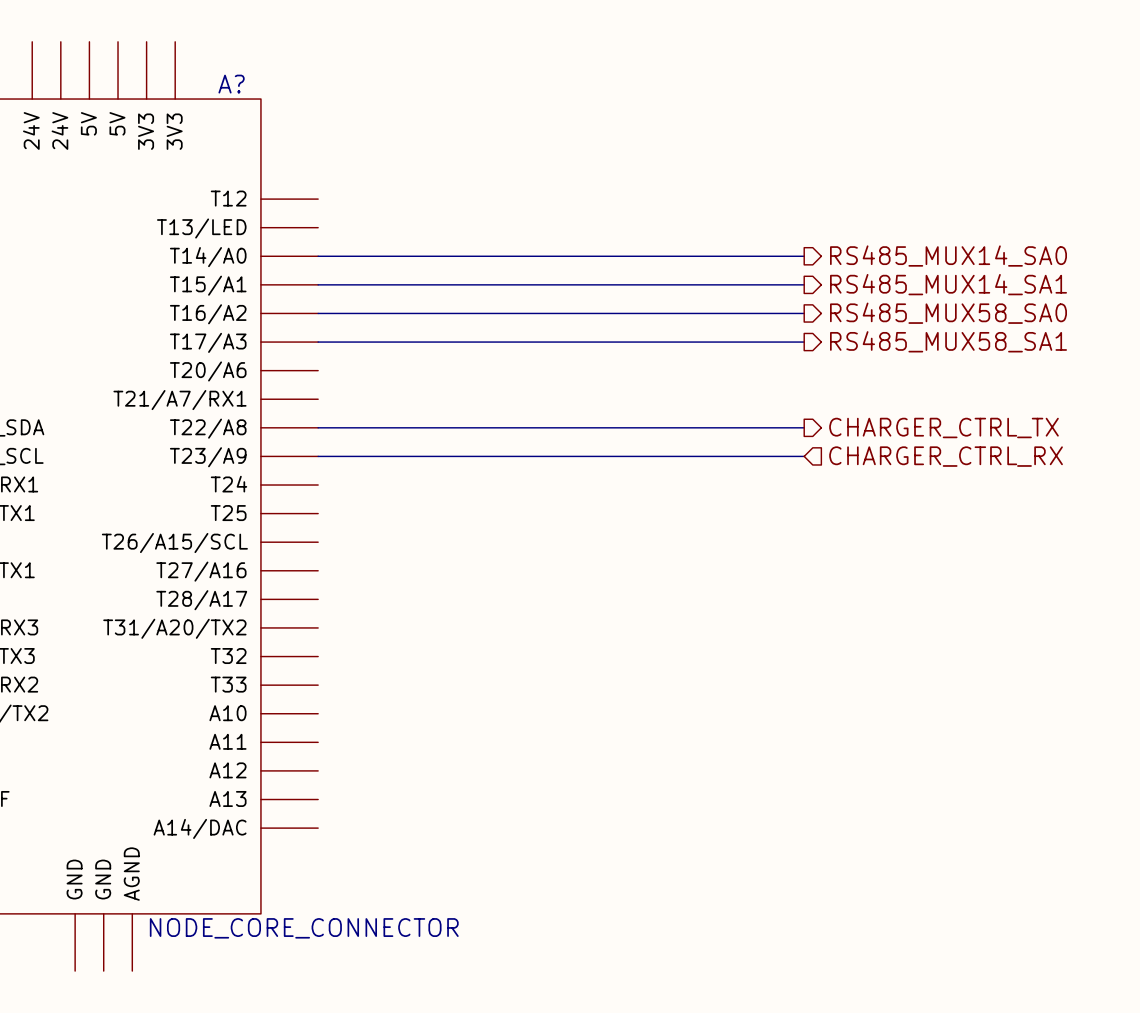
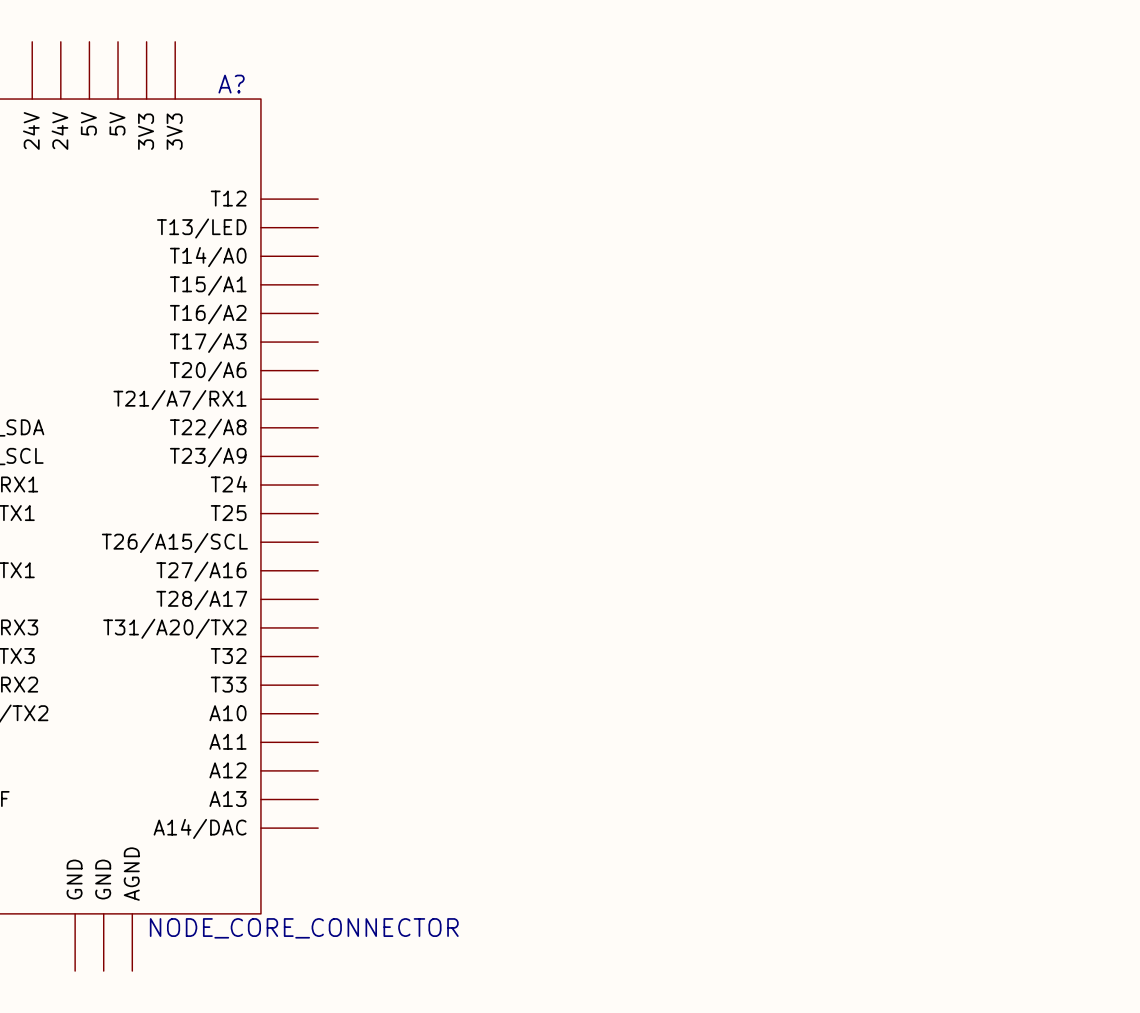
wire: (318, 256) (804, 256) -> none
hierarchical label: RS485_MUX14_SA0 (948, 256) -> none
wire: (318, 284) (804, 284) -> none
hierarchical label: RS485_MUX14_SA1 (948, 284) -> none
wire: (318, 313) (804, 313) -> none
hierarchical label: RS485_MUX58_SA0 (948, 313) -> none
hierarchical label: RS485_MUX58_SA1 (948, 341) -> none
wire: (318, 342) (804, 342) -> none
wire: (318, 427) (804, 427) -> none
hierarchical label: CHARGER_CTRL_TX (944, 427) -> none
wire: (318, 456) (804, 456) -> none
hierarchical label: CHARGER_CTRL_RX (946, 456) -> none

